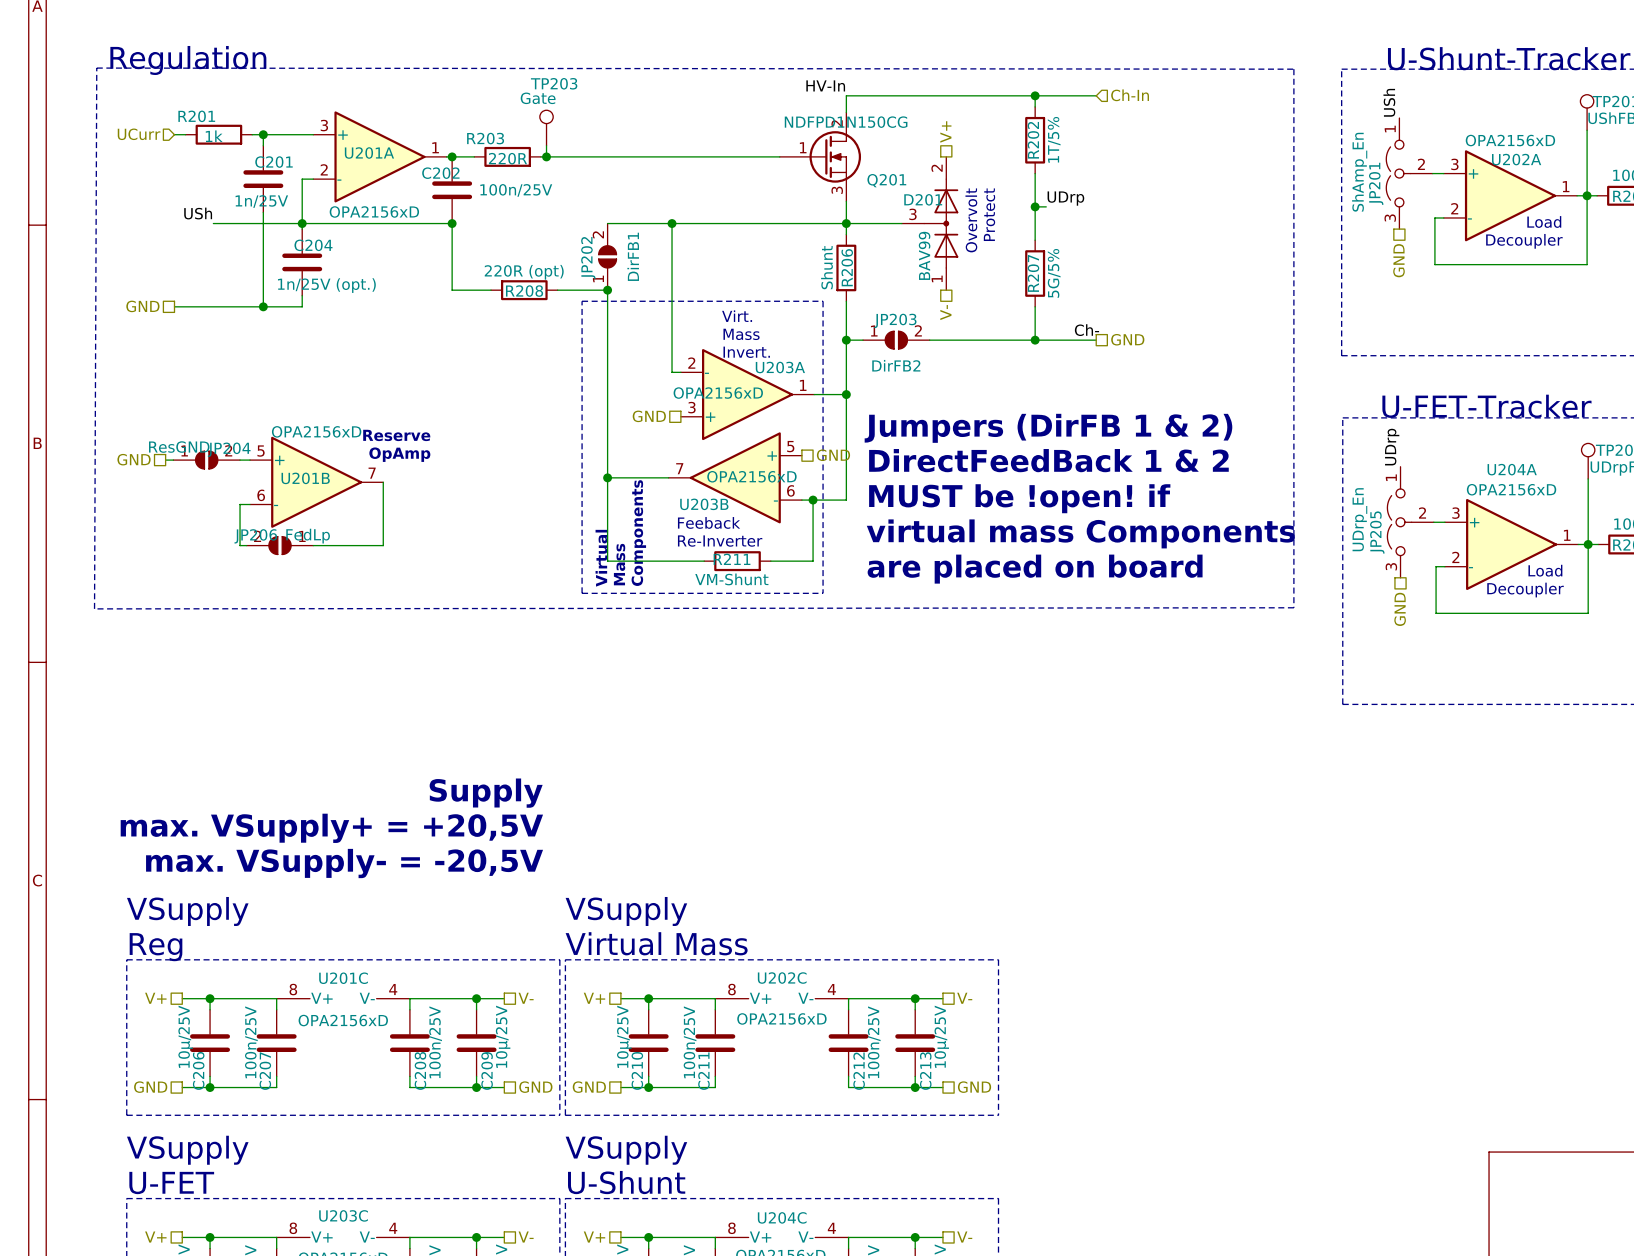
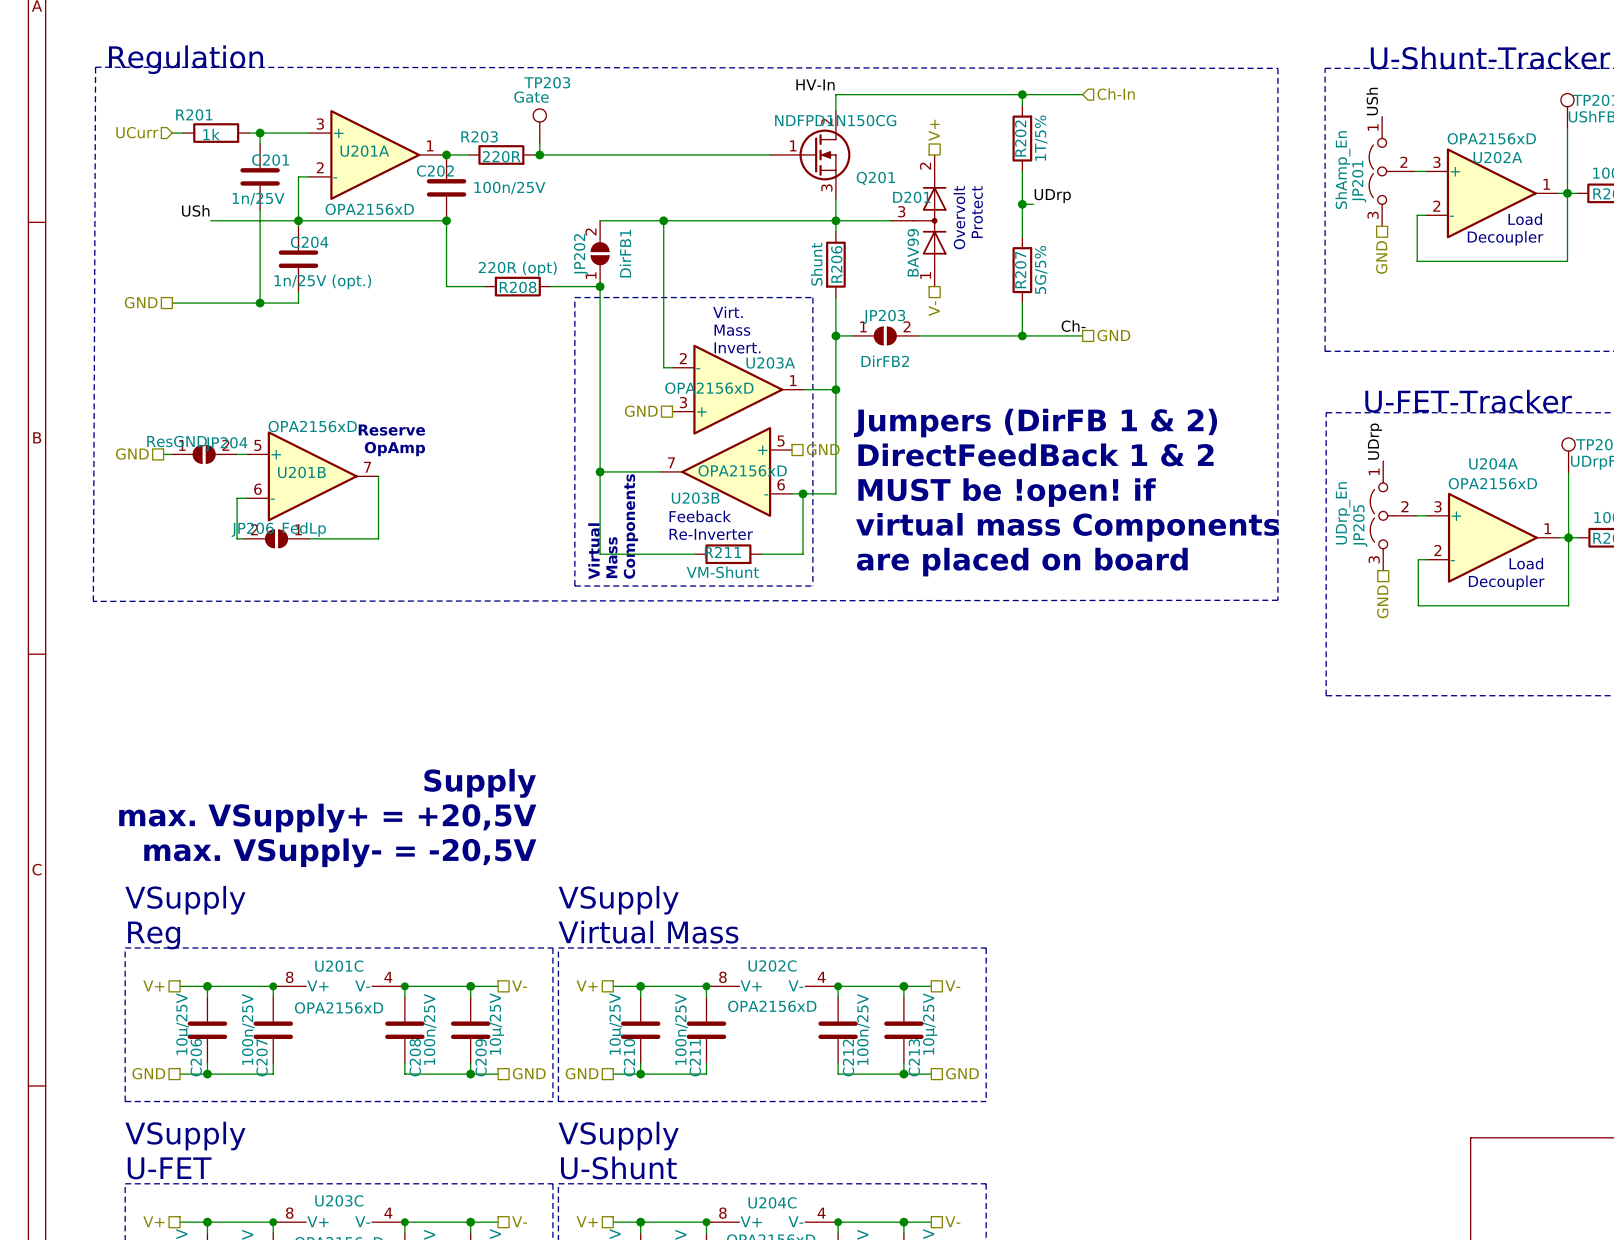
junction: none -> (273, 986)
junction: none -> (404, 986)
junction: none -> (706, 986)
junction: none -> (838, 986)
junction: none -> (273, 1222)
junction: none -> (404, 1222)
junction: none -> (706, 1222)
junction: none -> (838, 1222)

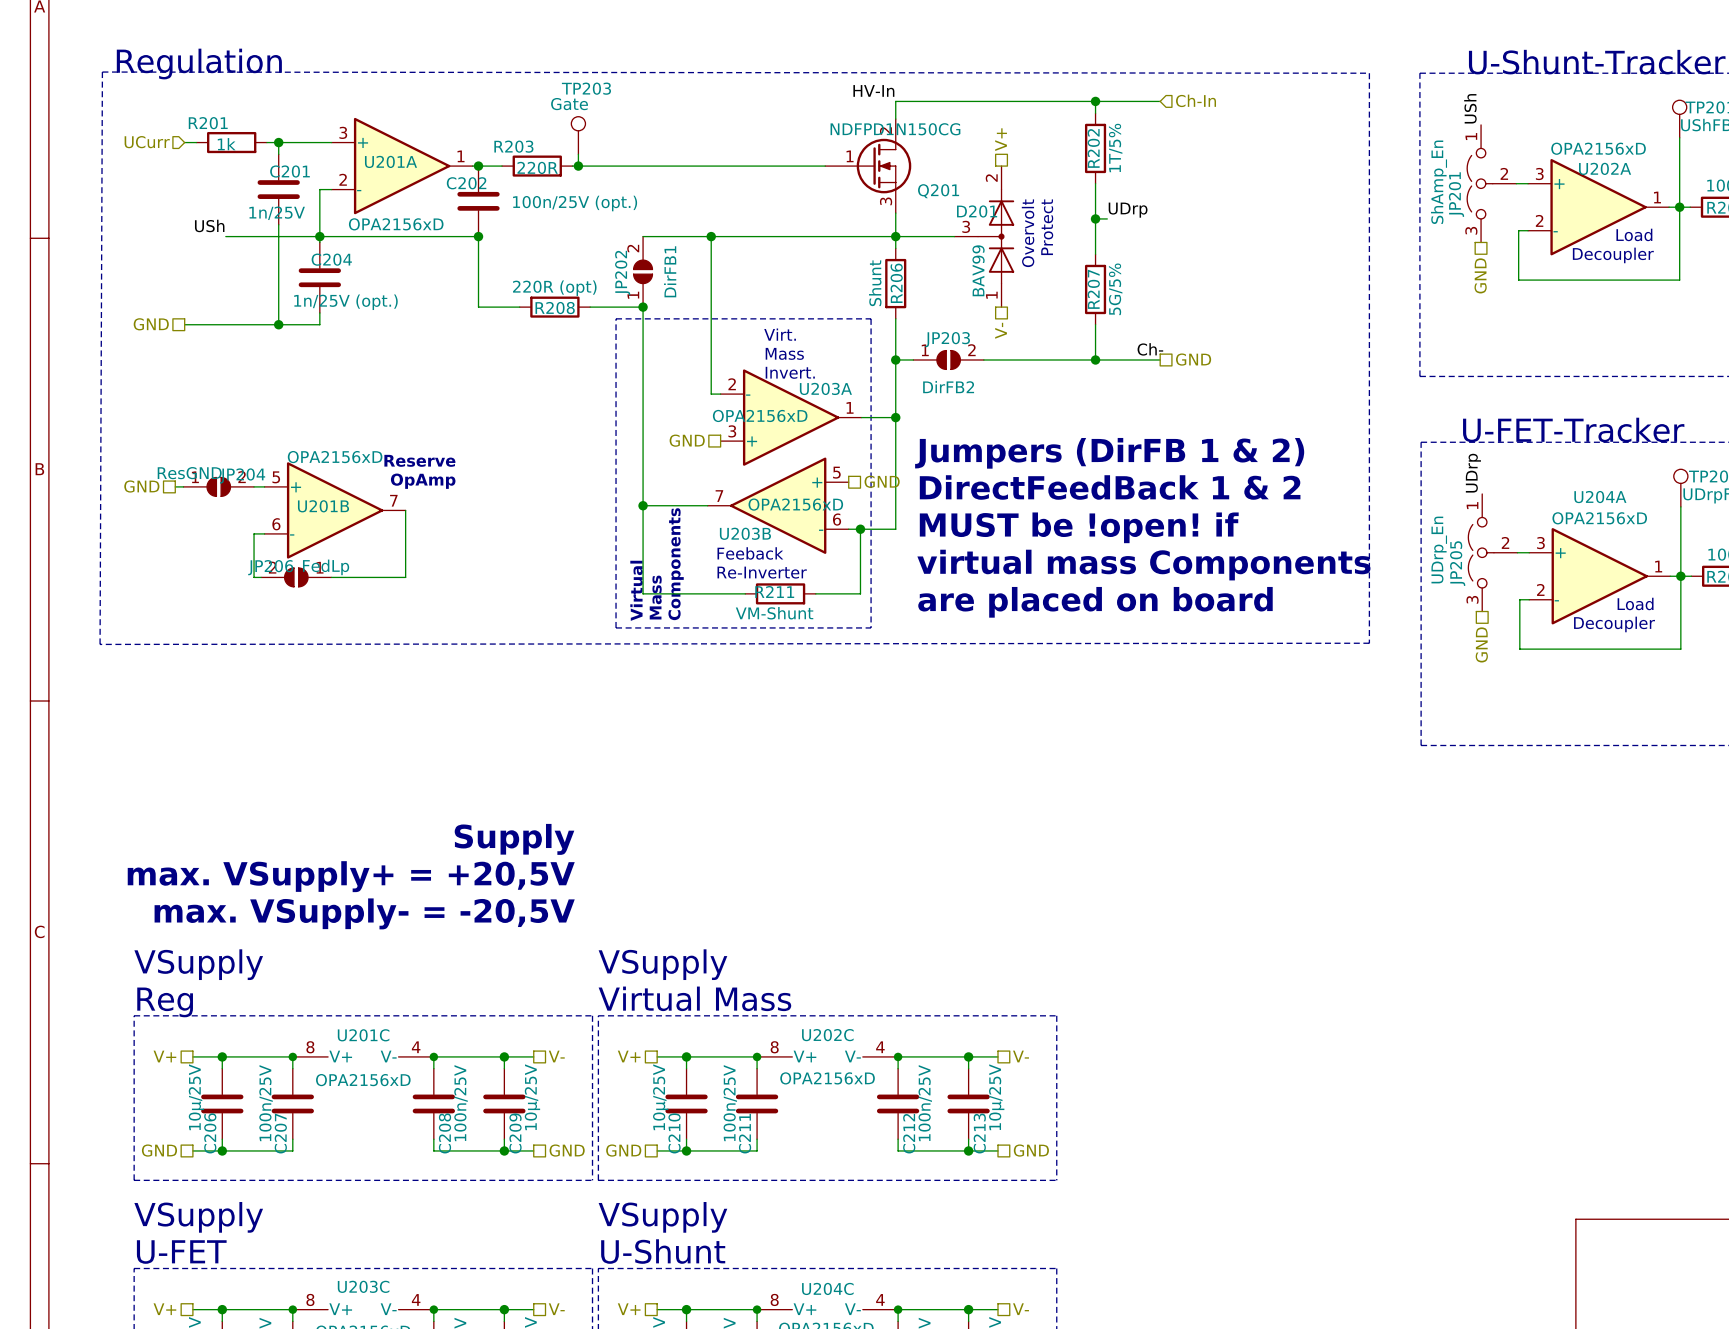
C202 value: 100n/25V (509, 188) -> 100n/25V (opt.) (575, 203)

